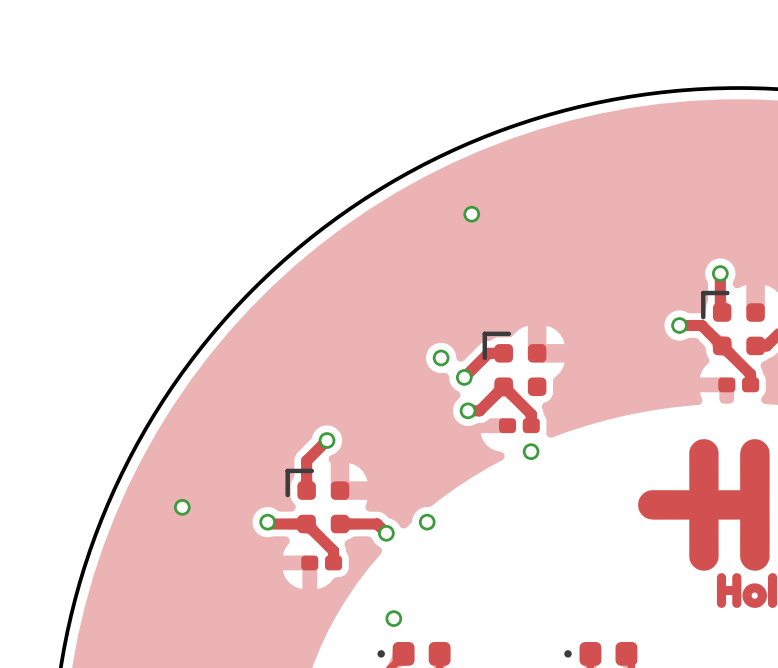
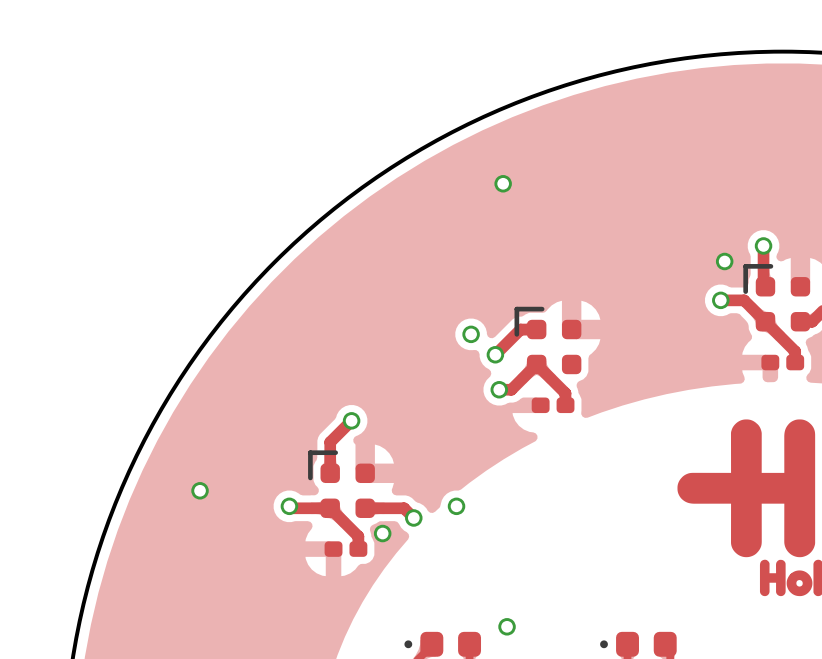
via: none -> (724, 261)
via: (531, 451) -> none
via: none -> (382, 533)
via: (393, 618) -> none
via: none -> (507, 626)

